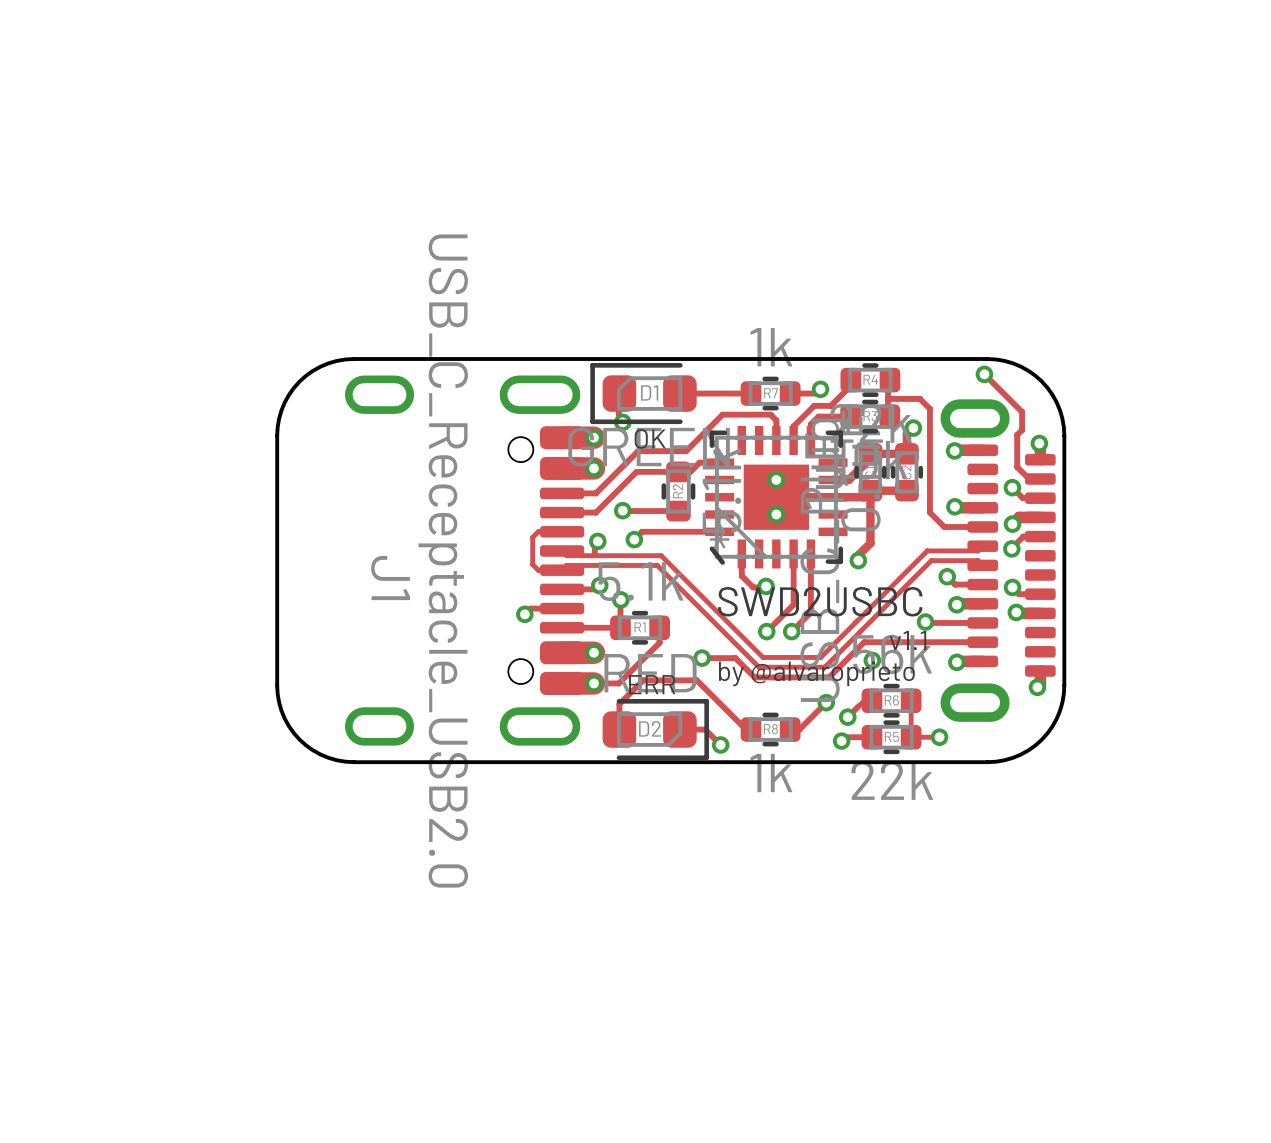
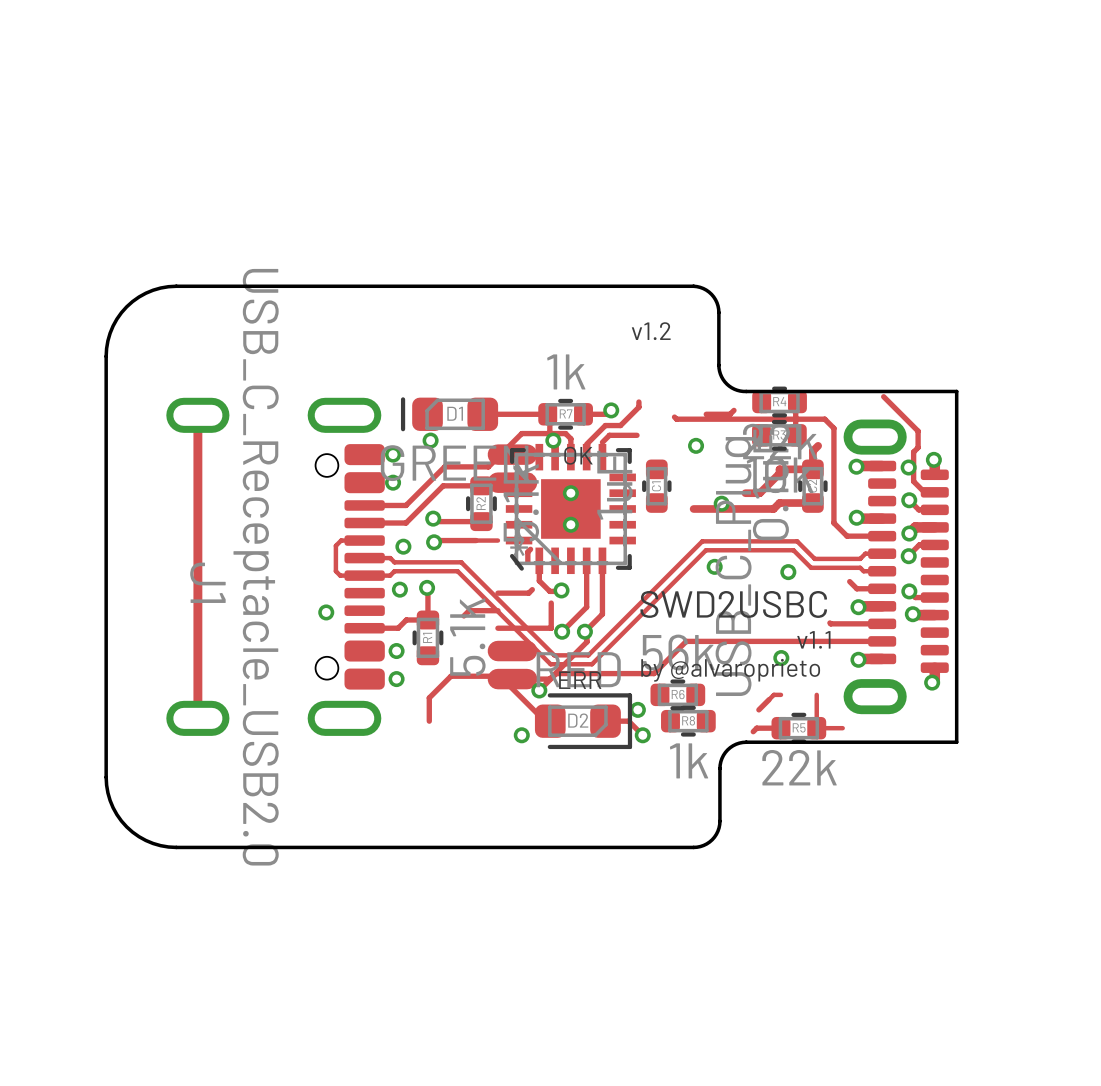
text: none -> v1.2 (651, 331)
D1 footprint: [590, 363, 697, 425] -> [400, 397, 499, 432]
via: (984, 374) -> none
track: none -> (638, 402) (638, 407) (620, 425) (605, 425) (586, 444)
track: (850, 380) (850, 385) (830, 405) (814, 405) (793, 426) (793, 440) -> none
via: none -> (611, 410)
via: (820, 389) -> none
track: none -> (583, 414) (607, 414)
track: (688, 393) (751, 393) -> (490, 414) (547, 414)
R7 position: (770, 393) -> (565, 414)
track: none -> (197, 415) (197, 718)
track: none -> (674, 417) (676, 419) (795, 419)
track: none -> (636, 435) (609, 435) (602, 442)
track: (848, 416) (818, 416) (810, 424) (810, 440) -> none
via: none -> (430, 440)
via: none -> (696, 445)
via: (913, 428) -> none
board edge: (1064, 435) (1060, 410) (1052, 394) (1041, 381) (1028, 370) (1012, 363) (987, 359) (345, 359) (320, 366) (299, 381) (284, 402) (279, 418) (277, 435) (277, 693) (281, 710) (293, 733) (313, 750) (328, 757) (353, 762) (996, 761) (1020, 754) (1041, 739) (1052, 726) (1060, 710) (1064, 685) -> (956, 452) (956, 391) (746, 391) (731, 387) (723, 379) (719, 368) (718, 312) (716, 302) (709, 292) (696, 286) (168, 286) (145, 293) (126, 306) (113, 325) (106, 348) (106, 785) (110, 800) (121, 821) (138, 836) (153, 843) (176, 847) (700, 846) (712, 839) (719, 827) (720, 765) (725, 752) (733, 745) (746, 742) (956, 742) (956, 680)
via: none -> (393, 454)
via: (593, 437) -> none
track: none -> (570, 457) (570, 438) (565, 433) (521, 433) (488, 466) (444, 466) (406, 505) (364, 505)
track: (776, 440) (776, 420) (770, 414) (722, 414) (686, 451) (638, 451) (595, 493) (562, 493) -> none
via: none -> (908, 467)
track: none -> (519, 477) (500, 477) (492, 485) (443, 485) (406, 523) (364, 523)
track: (719, 462) (699, 462) (690, 471) (636, 471) (595, 512) (562, 512) -> none
via: none -> (393, 482)
via: (593, 468) -> none
C1 position: (870, 472) -> (656, 486)
via: none -> (570, 493)
via: (776, 479) -> none
track: (870, 490) (870, 543) (858, 555) (858, 560) -> none
R2 position: (678, 491) -> (481, 503)
via: none -> (721, 503)
part position: (776, 497) -> (570, 508)
track: none -> (433, 518) (436, 521) (481, 521)
via: none -> (433, 518)
via: (622, 510) -> none
track: (623, 511) (678, 511) -> none
via: none -> (570, 524)
via: (776, 514) -> none
track: (538, 531) (532, 537) (532, 564) (538, 570) (562, 570) (566, 565) (657, 565) (758, 667) (824, 667) (931, 560) (978, 560) (982, 565) -> (364, 540) (341, 540) (335, 545) (335, 571) (340, 575) (390, 575) (394, 571) (457, 571) (550, 664) (592, 664) (706, 550) (793, 550) (811, 567) (860, 567) (863, 571) (882, 571)
track: none -> (476, 540) (435, 540) (434, 542)
track: (719, 531) (642, 531) (634, 539) -> none
via: none -> (434, 542)
via: none -> (403, 546)
via: (634, 539) -> none
via: (597, 541) -> none
track: (982, 546) (978, 550) (927, 550) (820, 657) (763, 657) (661, 555) (566, 555) (562, 550) -> (882, 553) (865, 553) (860, 558) (814, 558) (797, 541) (702, 541) (588, 655) (554, 655) (461, 562) (394, 562) (390, 558) (364, 558)
track: none -> (539, 560) (539, 580) (549, 591) (560, 591)
track: (741, 553) (741, 575) (753, 587) (766, 586) -> none
track: (793, 553) (793, 604) (766, 631) -> (586, 560) (586, 607) (562, 631)
track: (810, 553) (810, 612) (791, 631) -> (602, 560) (602, 614) (584, 631)
J1 position: (464, 560) -> (275, 566)
via: none -> (714, 566)
via position: (858, 560) -> (788, 572)
via: (947, 576) -> none
track: none -> (427, 587) (427, 619) (406, 619) (398, 628) (364, 628)
via: none -> (427, 587)
via: none -> (399, 589)
via: (599, 585) -> none
via: (766, 586) -> none
via position: (620, 599) -> (561, 590)
via: none -> (326, 612)
via: (524, 614) -> none
via: (925, 622) -> none
R1 rotation: 0° (640, 627) -> 90° clockwise (427, 637)
R1 position: (640, 627) -> (427, 637)
via: none -> (562, 631)
via: none -> (584, 631)
via: (766, 631) -> none
via: (791, 631) -> none
track: (864, 642) (829, 677) (754, 677) (735, 658) (702, 658) -> (773, 641) (686, 641) (654, 673) (556, 673) (539, 690)
via: none -> (396, 651)
via: (593, 652) -> none
via: (702, 658) -> none
via: none -> (396, 679)
via position: (593, 683) -> (539, 690)
R6 position: (891, 700) -> (677, 694)
track: (826, 702) (799, 729) (790, 729) -> none
via: (826, 702) -> none
via: none -> (637, 709)
via: (847, 717) -> none
track: none -> (429, 721) (429, 697) (450, 676) (499, 676) (544, 721)
track: (619, 729) (619, 704) (643, 680) (696, 680) (746, 729) (751, 729) -> none
via: (939, 737) -> none
via: (841, 741) -> none
via: none -> (521, 735)

